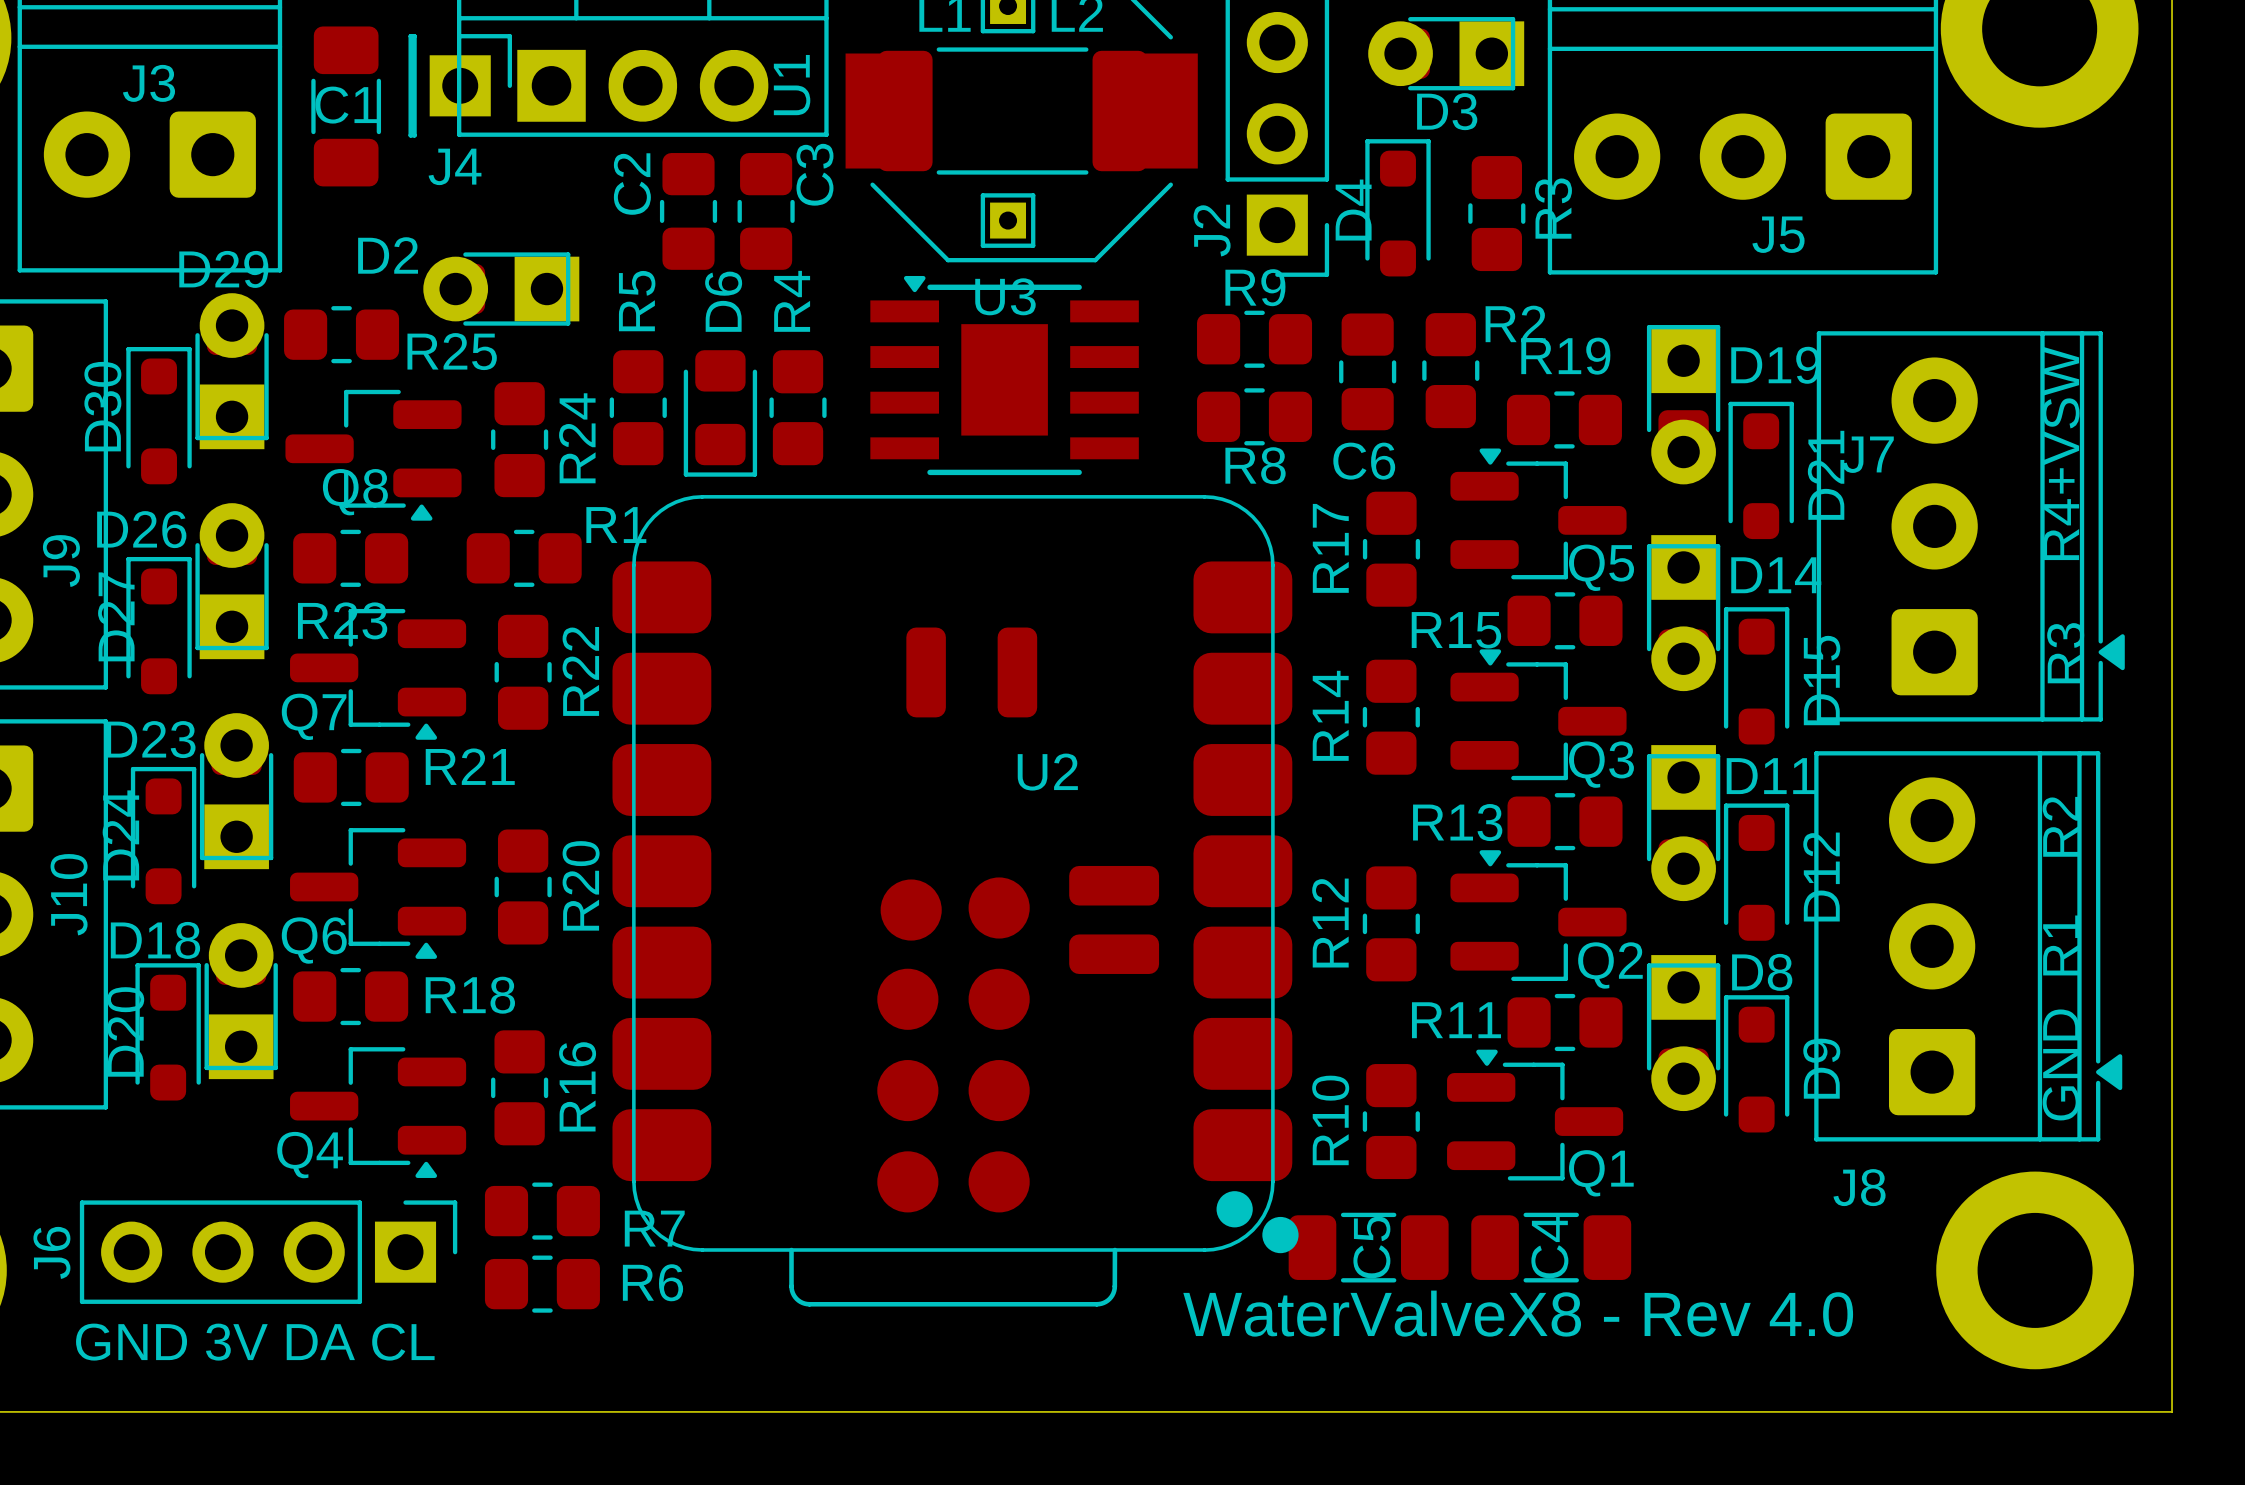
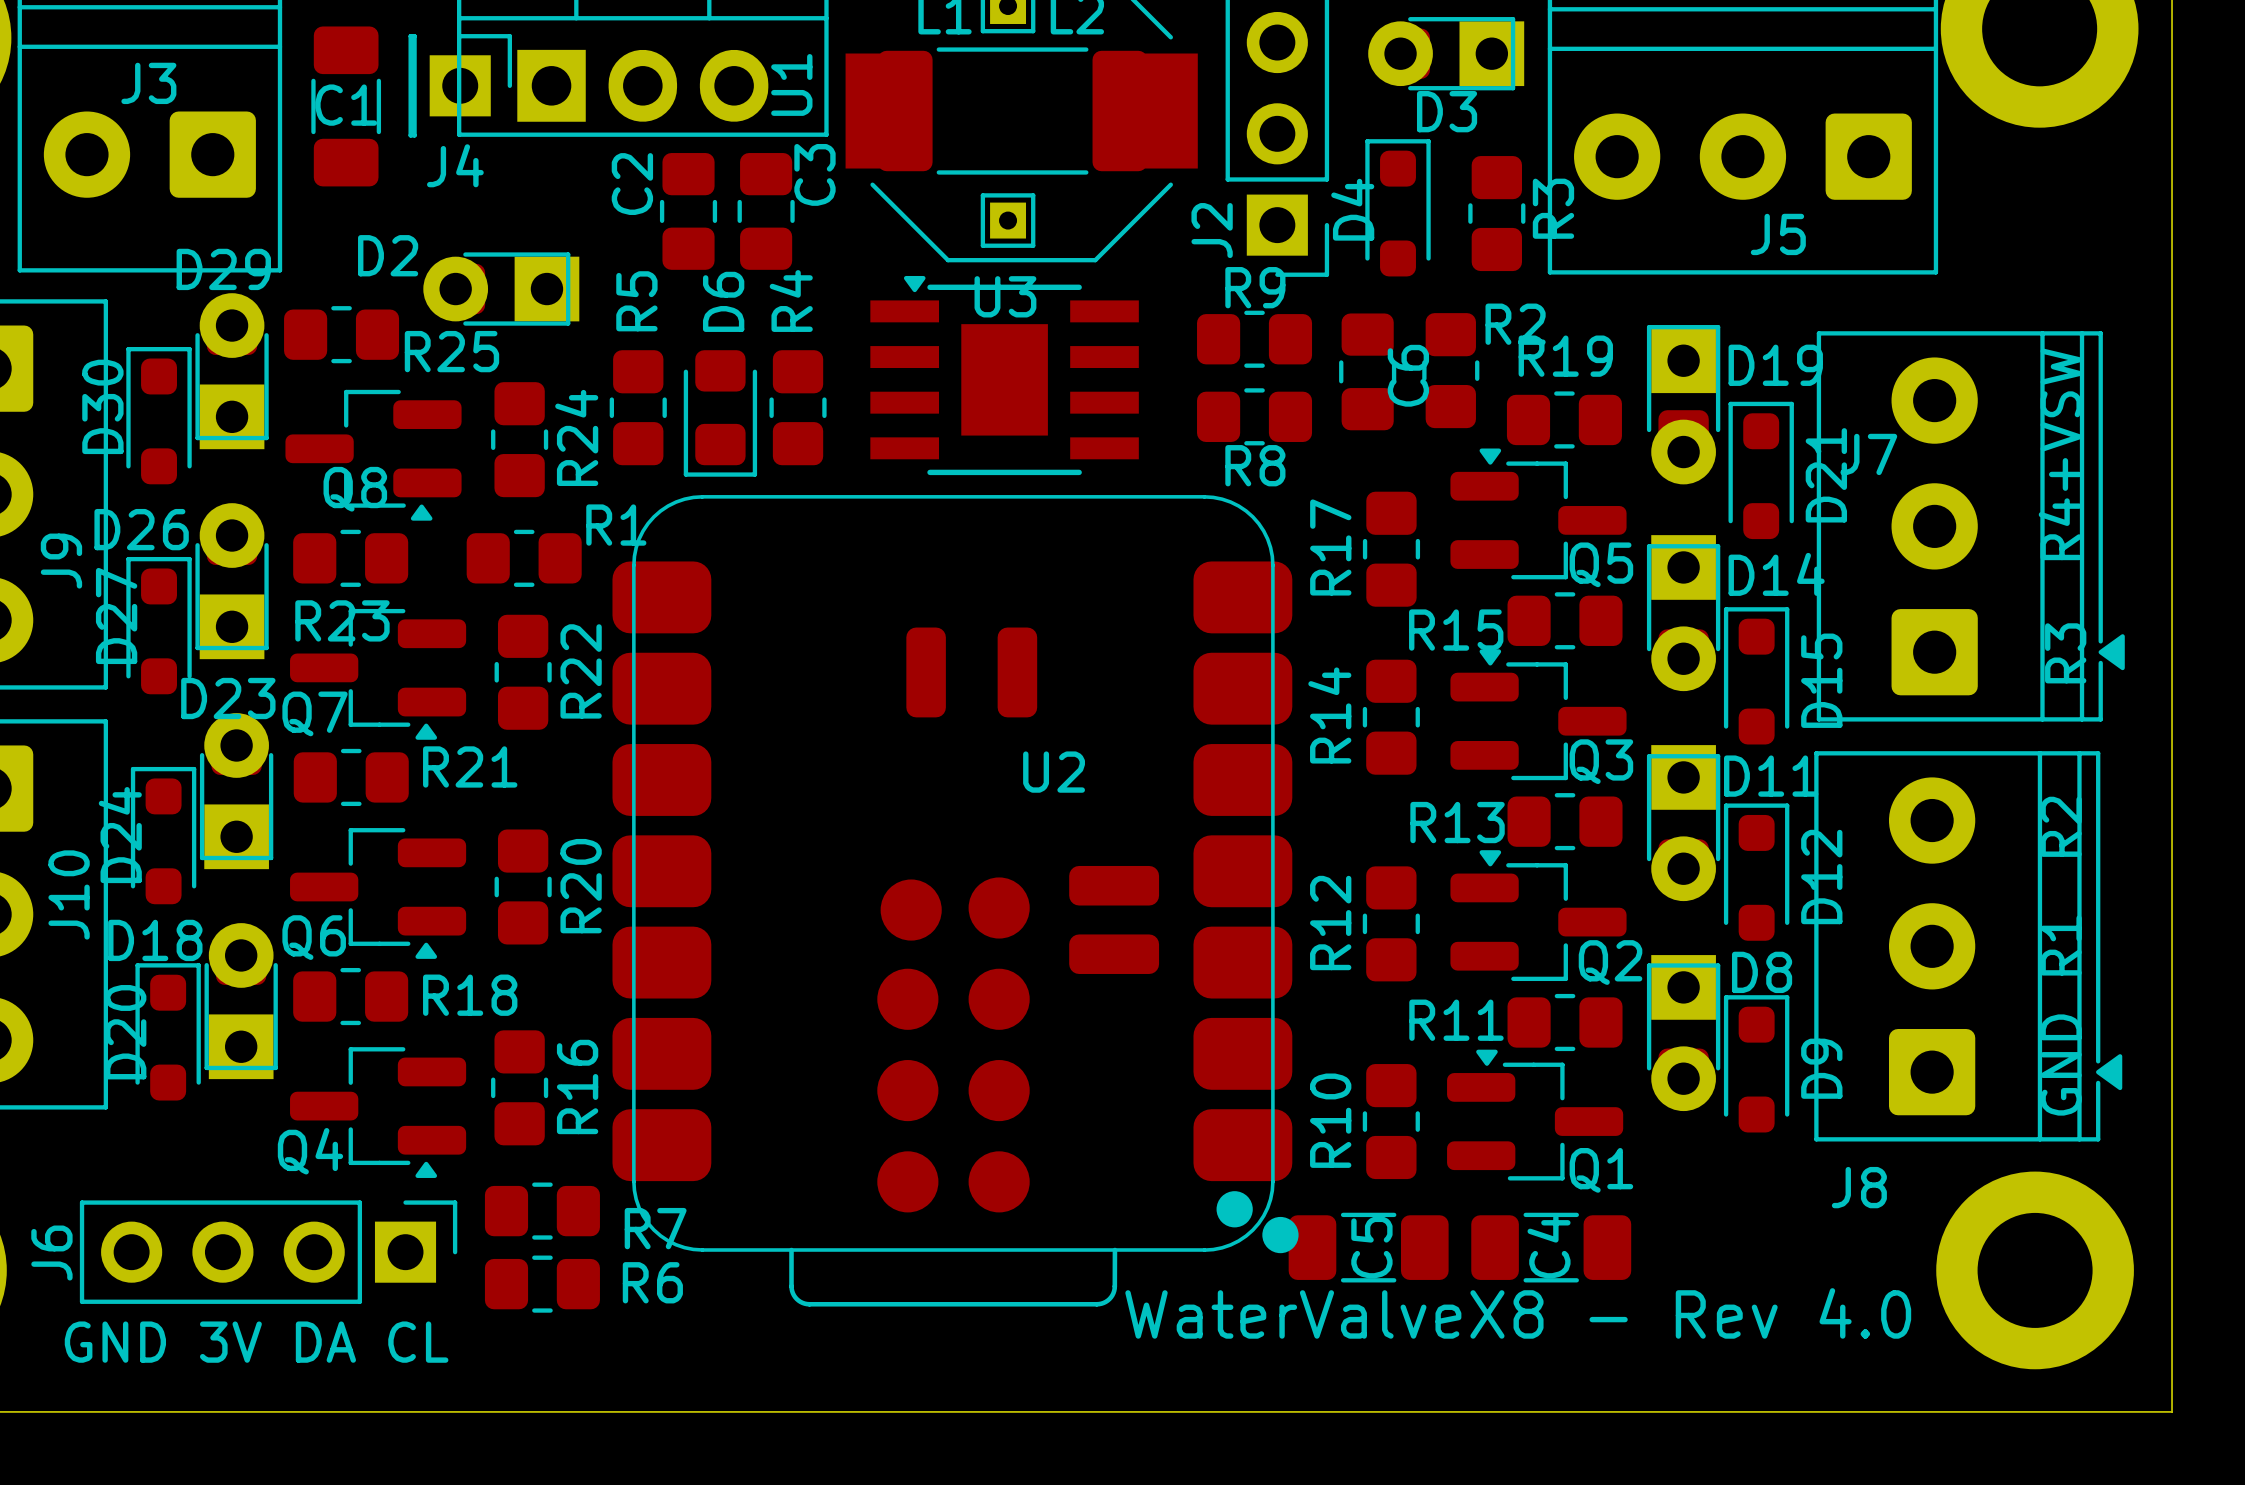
C6 name rotation: 0° (1364, 461) -> 90° counterclockwise (1408, 375)
C6 name position: C6 (1364, 461) -> C6 (1408, 375)
D23 name position: D23 (150, 739) -> D23 (228, 698)

